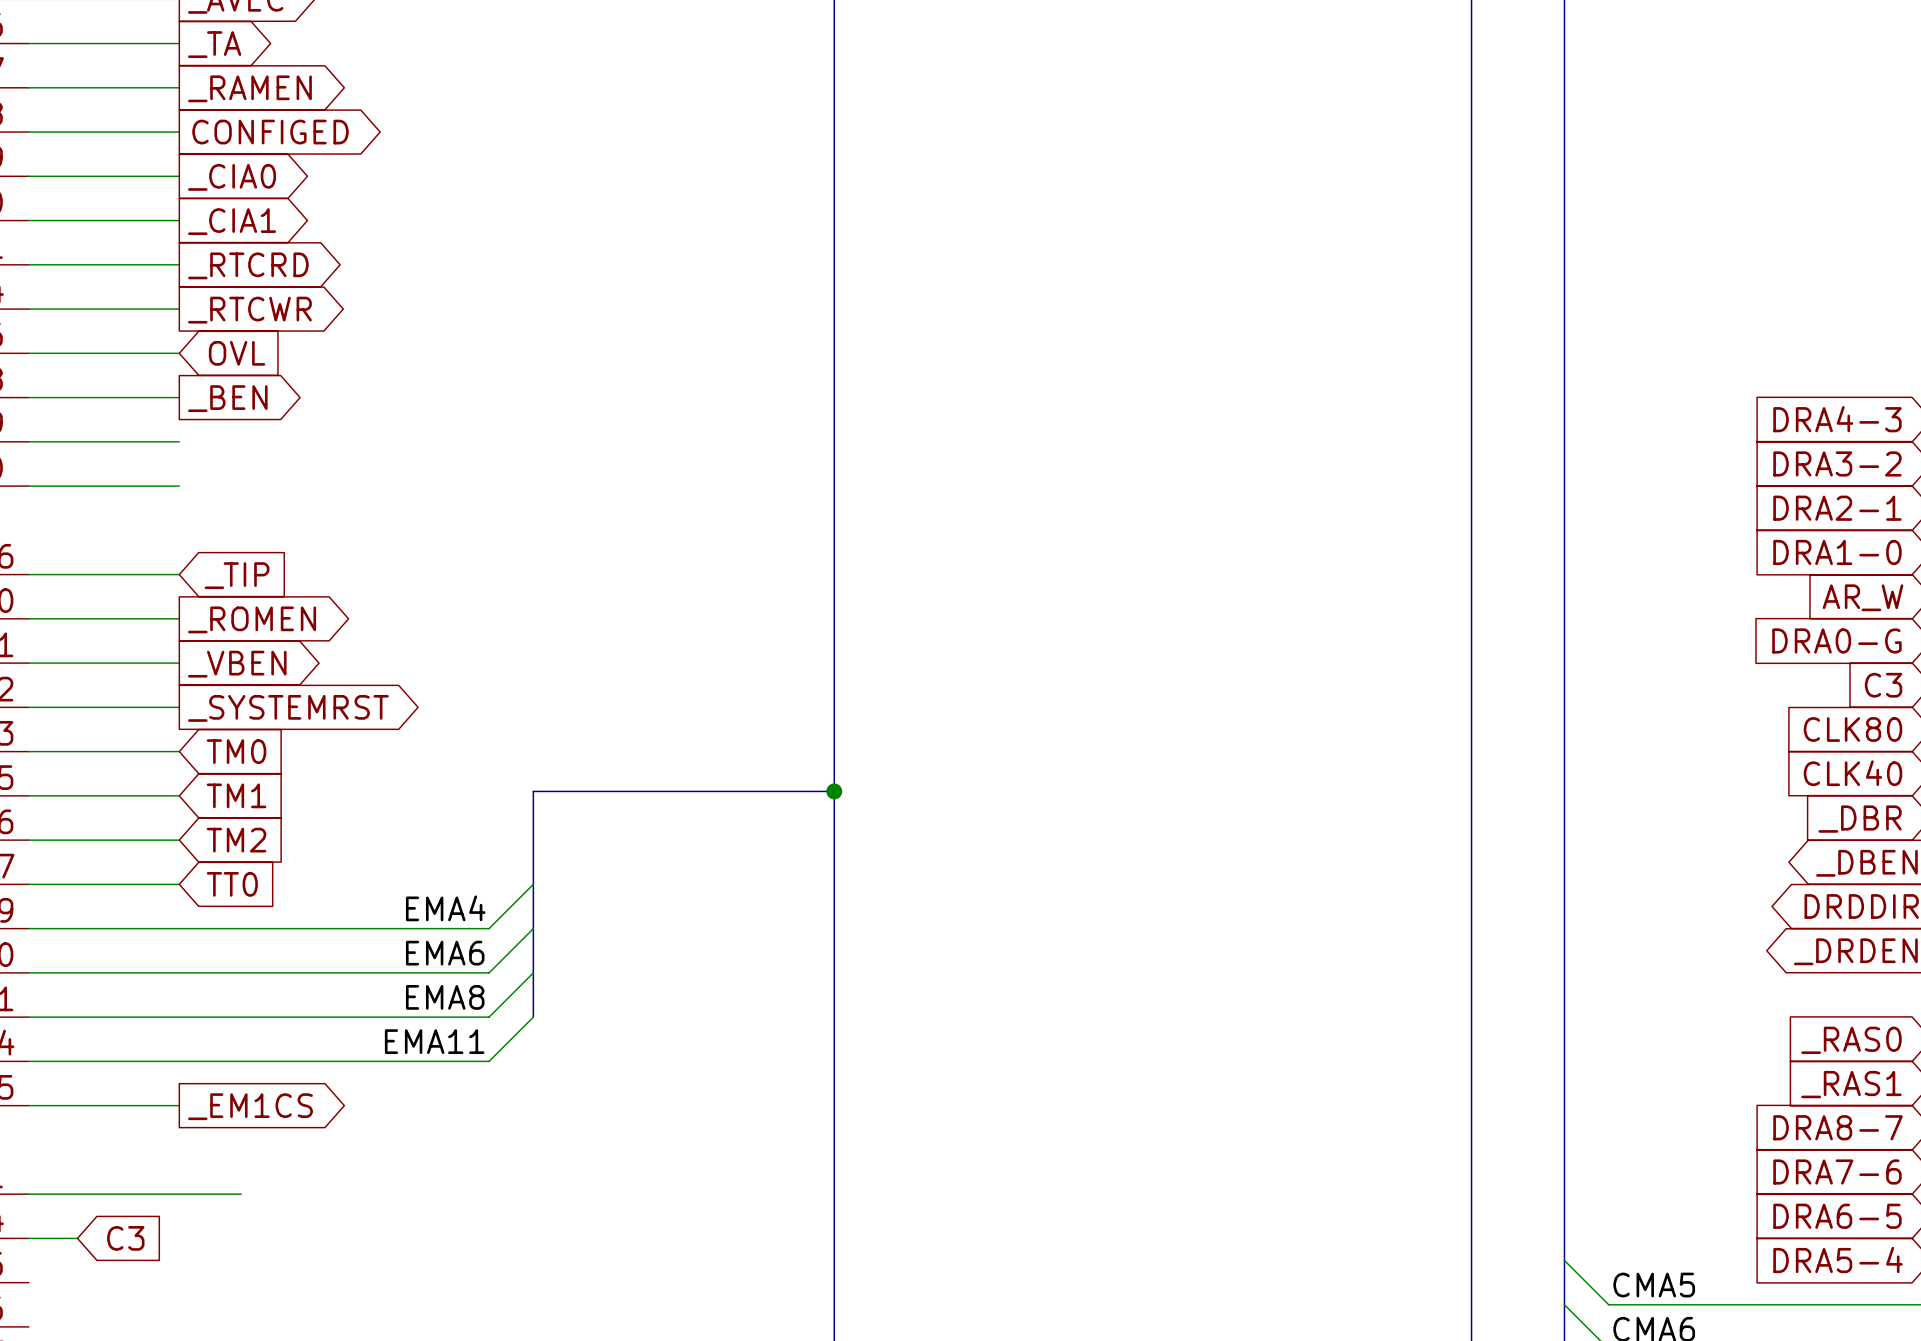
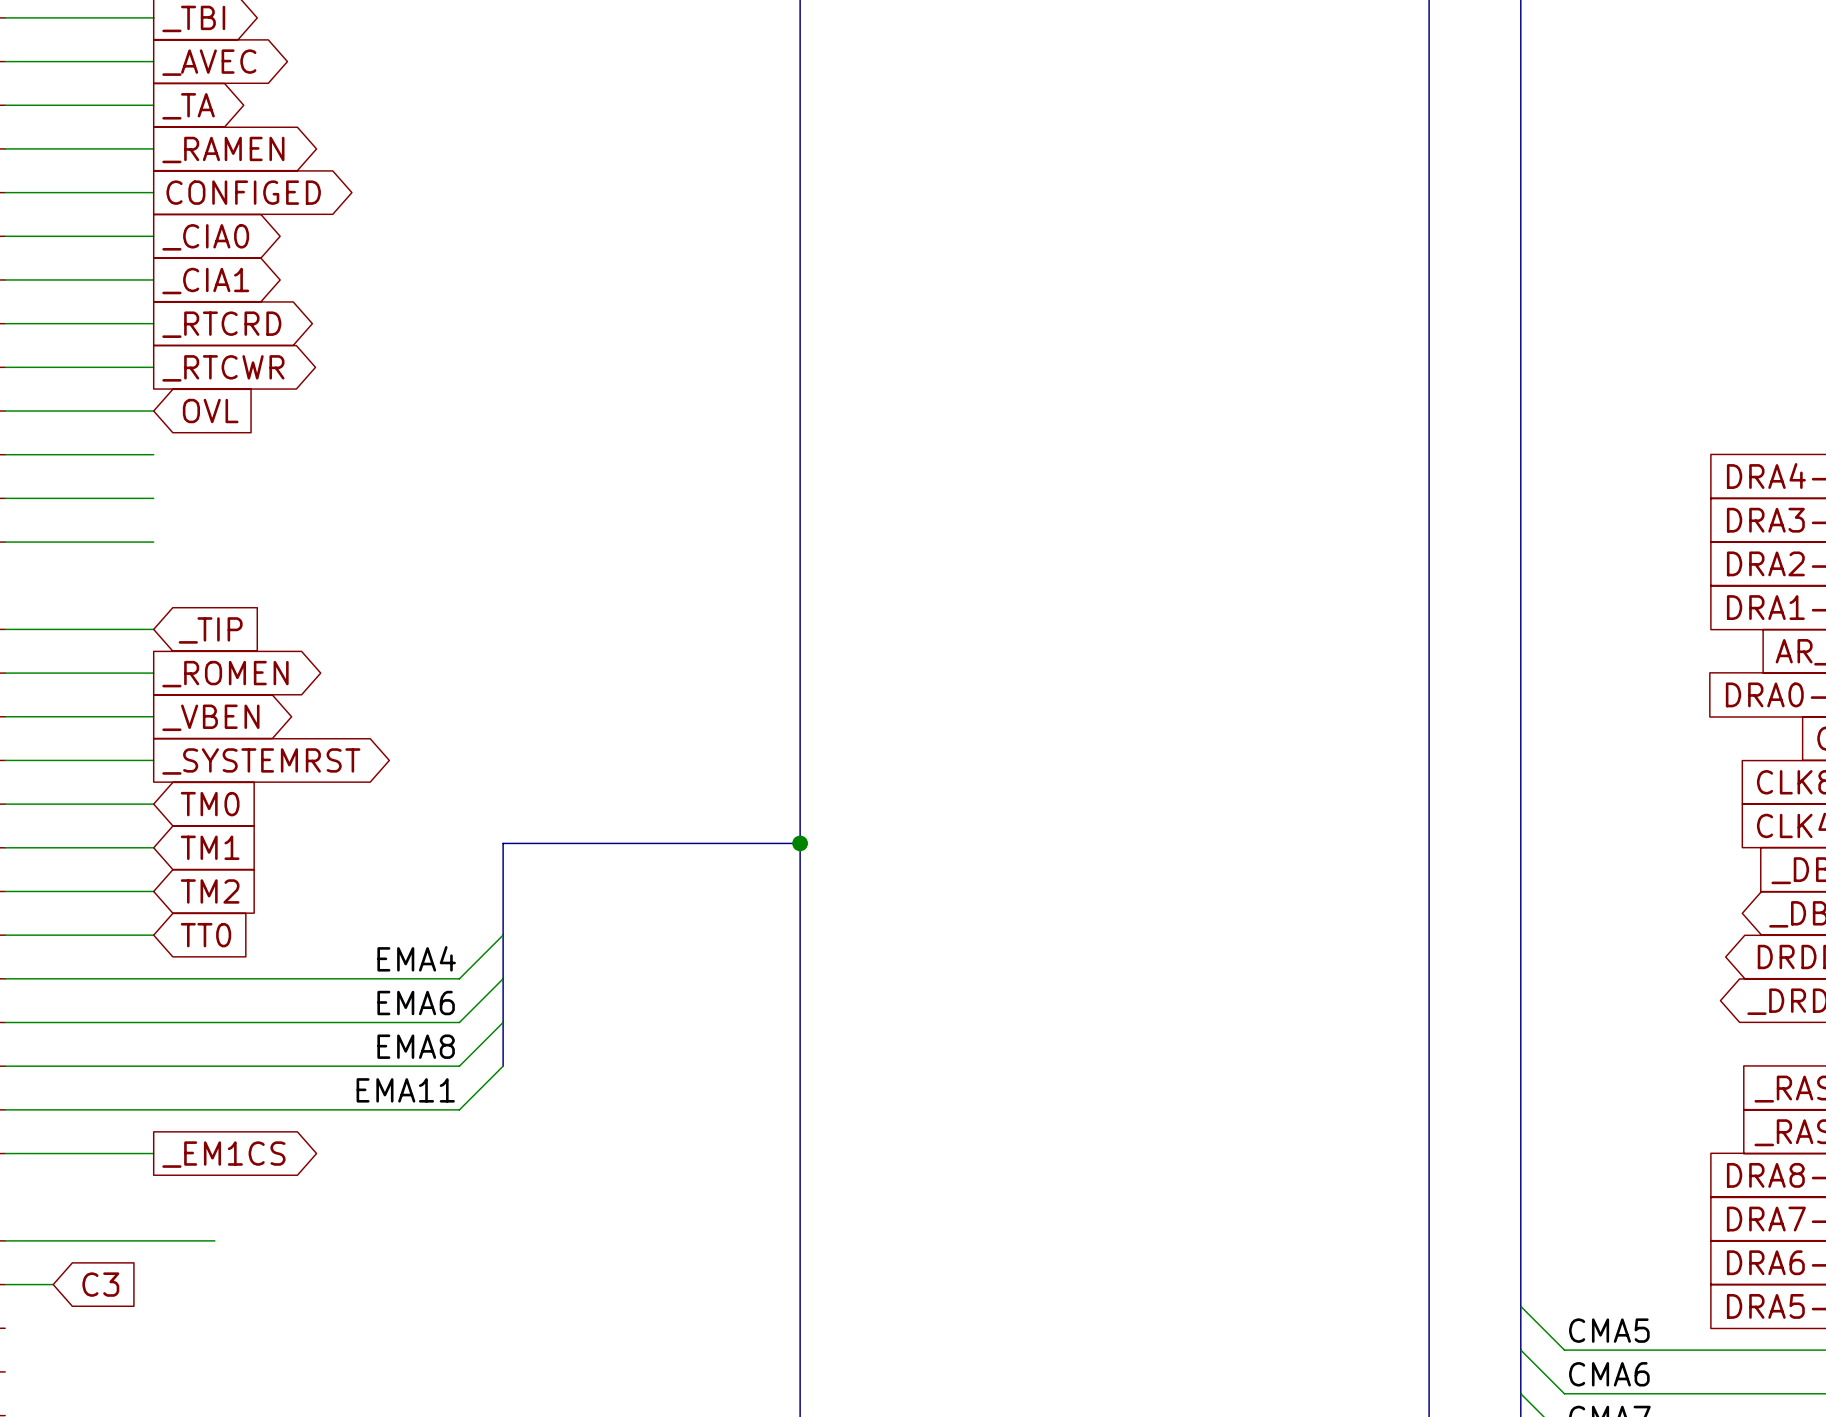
global label: _BEN (227, 398) -> none

